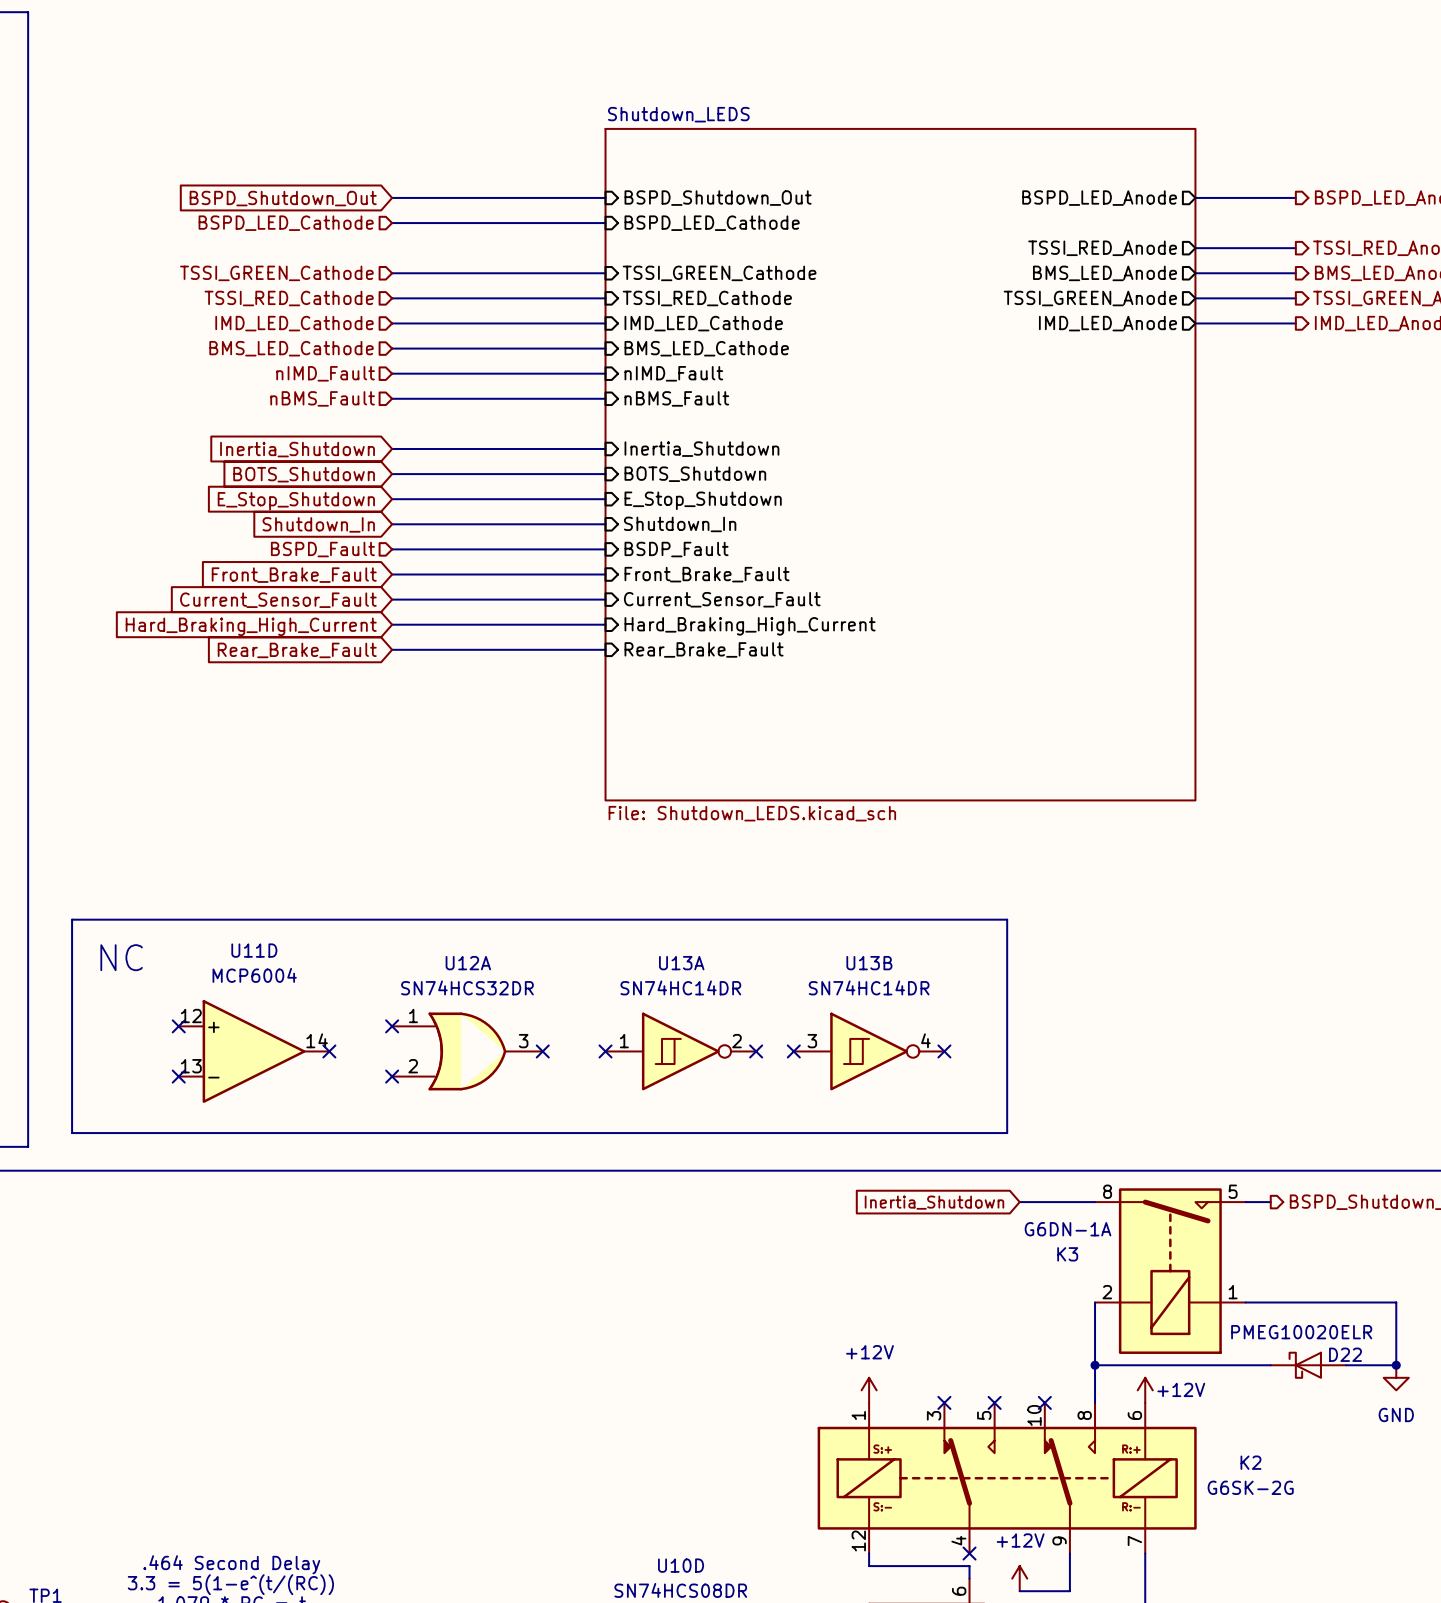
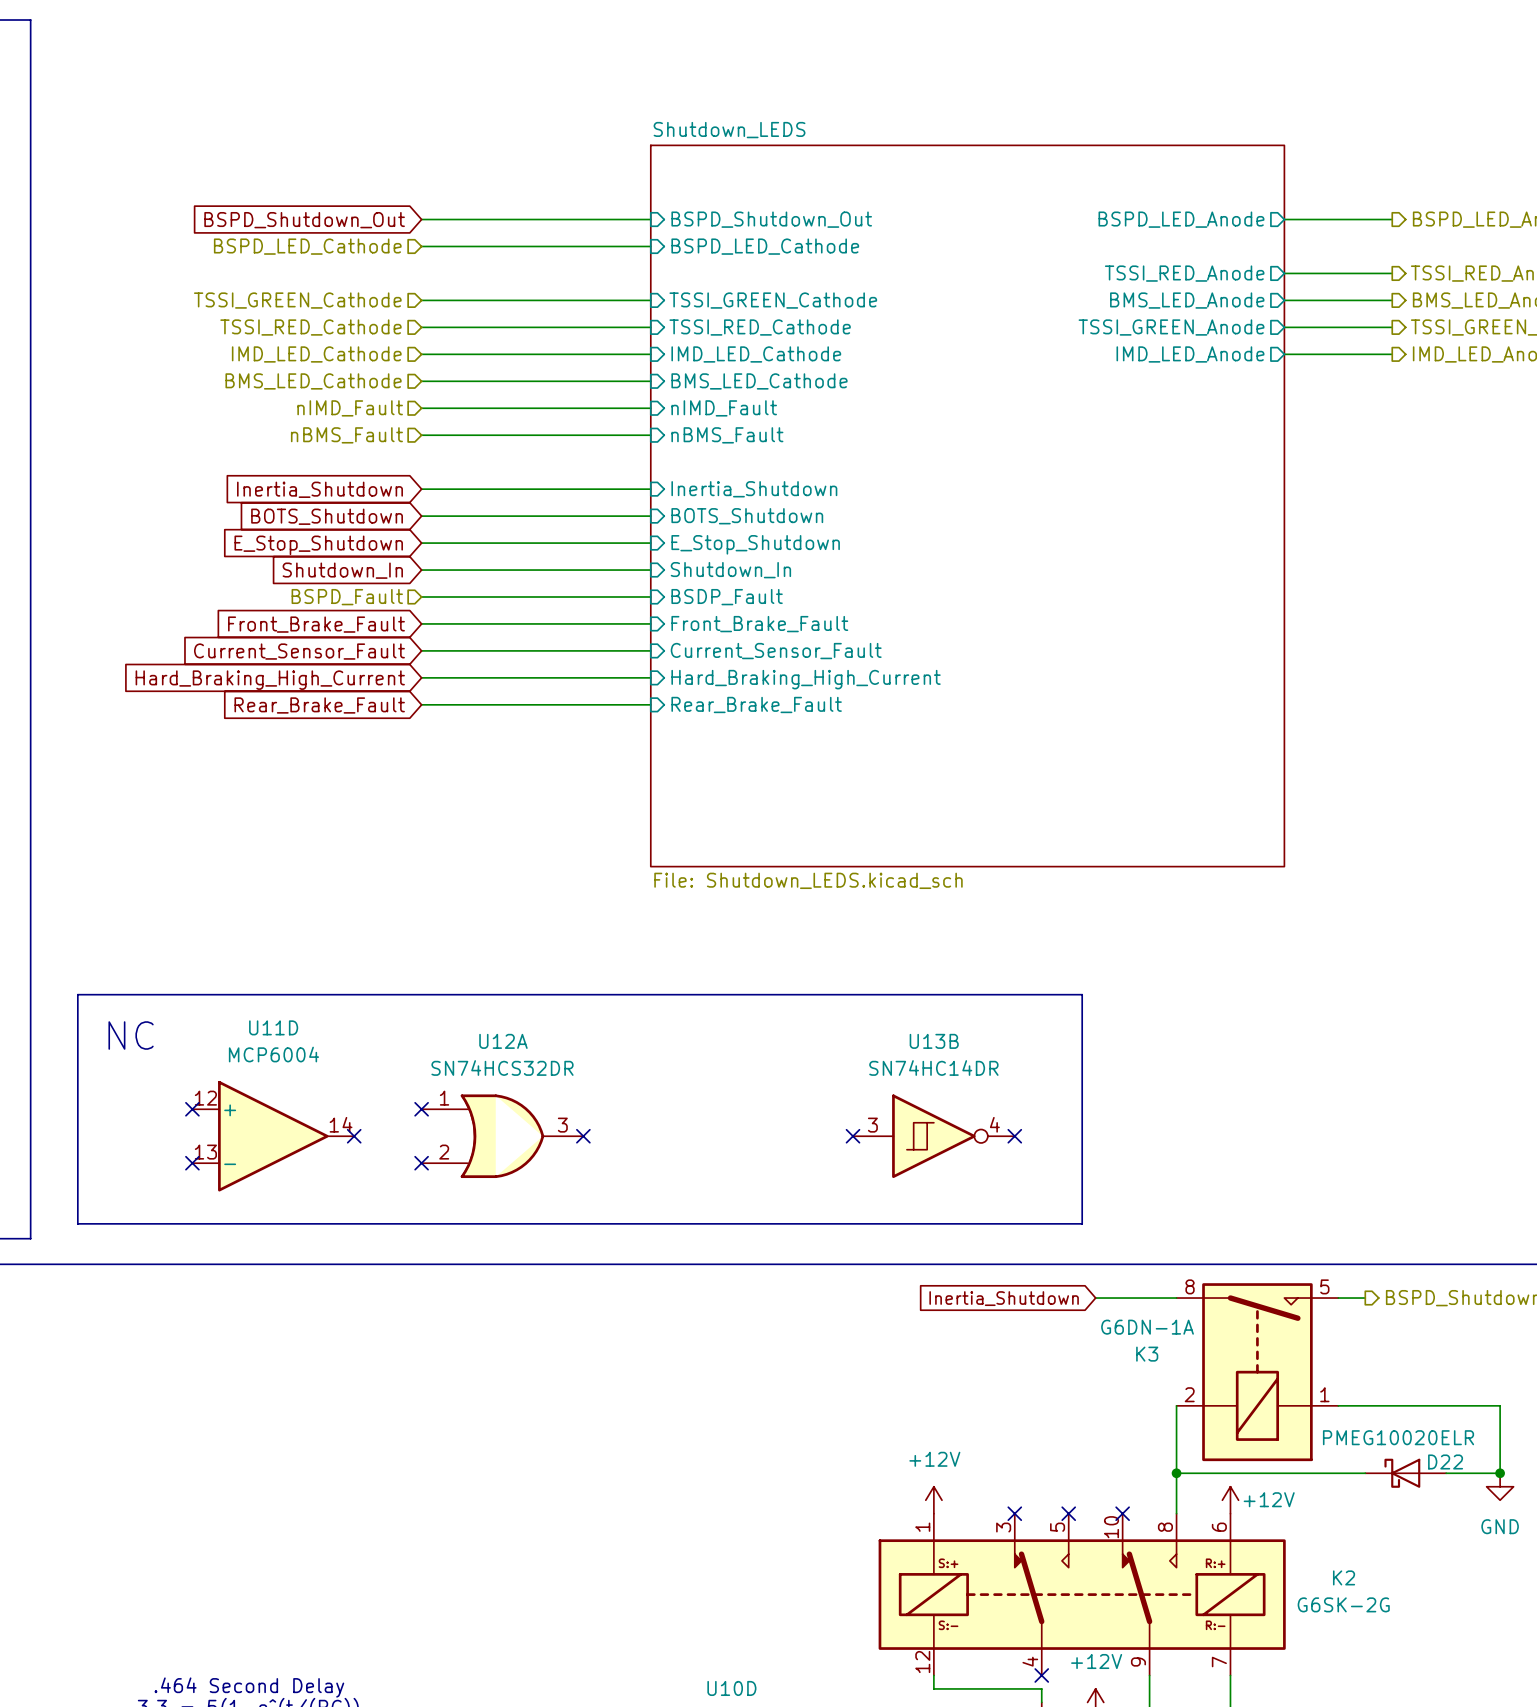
no-connect mark: (605, 1051) -> none
U13A: SN74HC14DR (680, 1051) -> none
no-connect mark: (756, 1051) -> none

